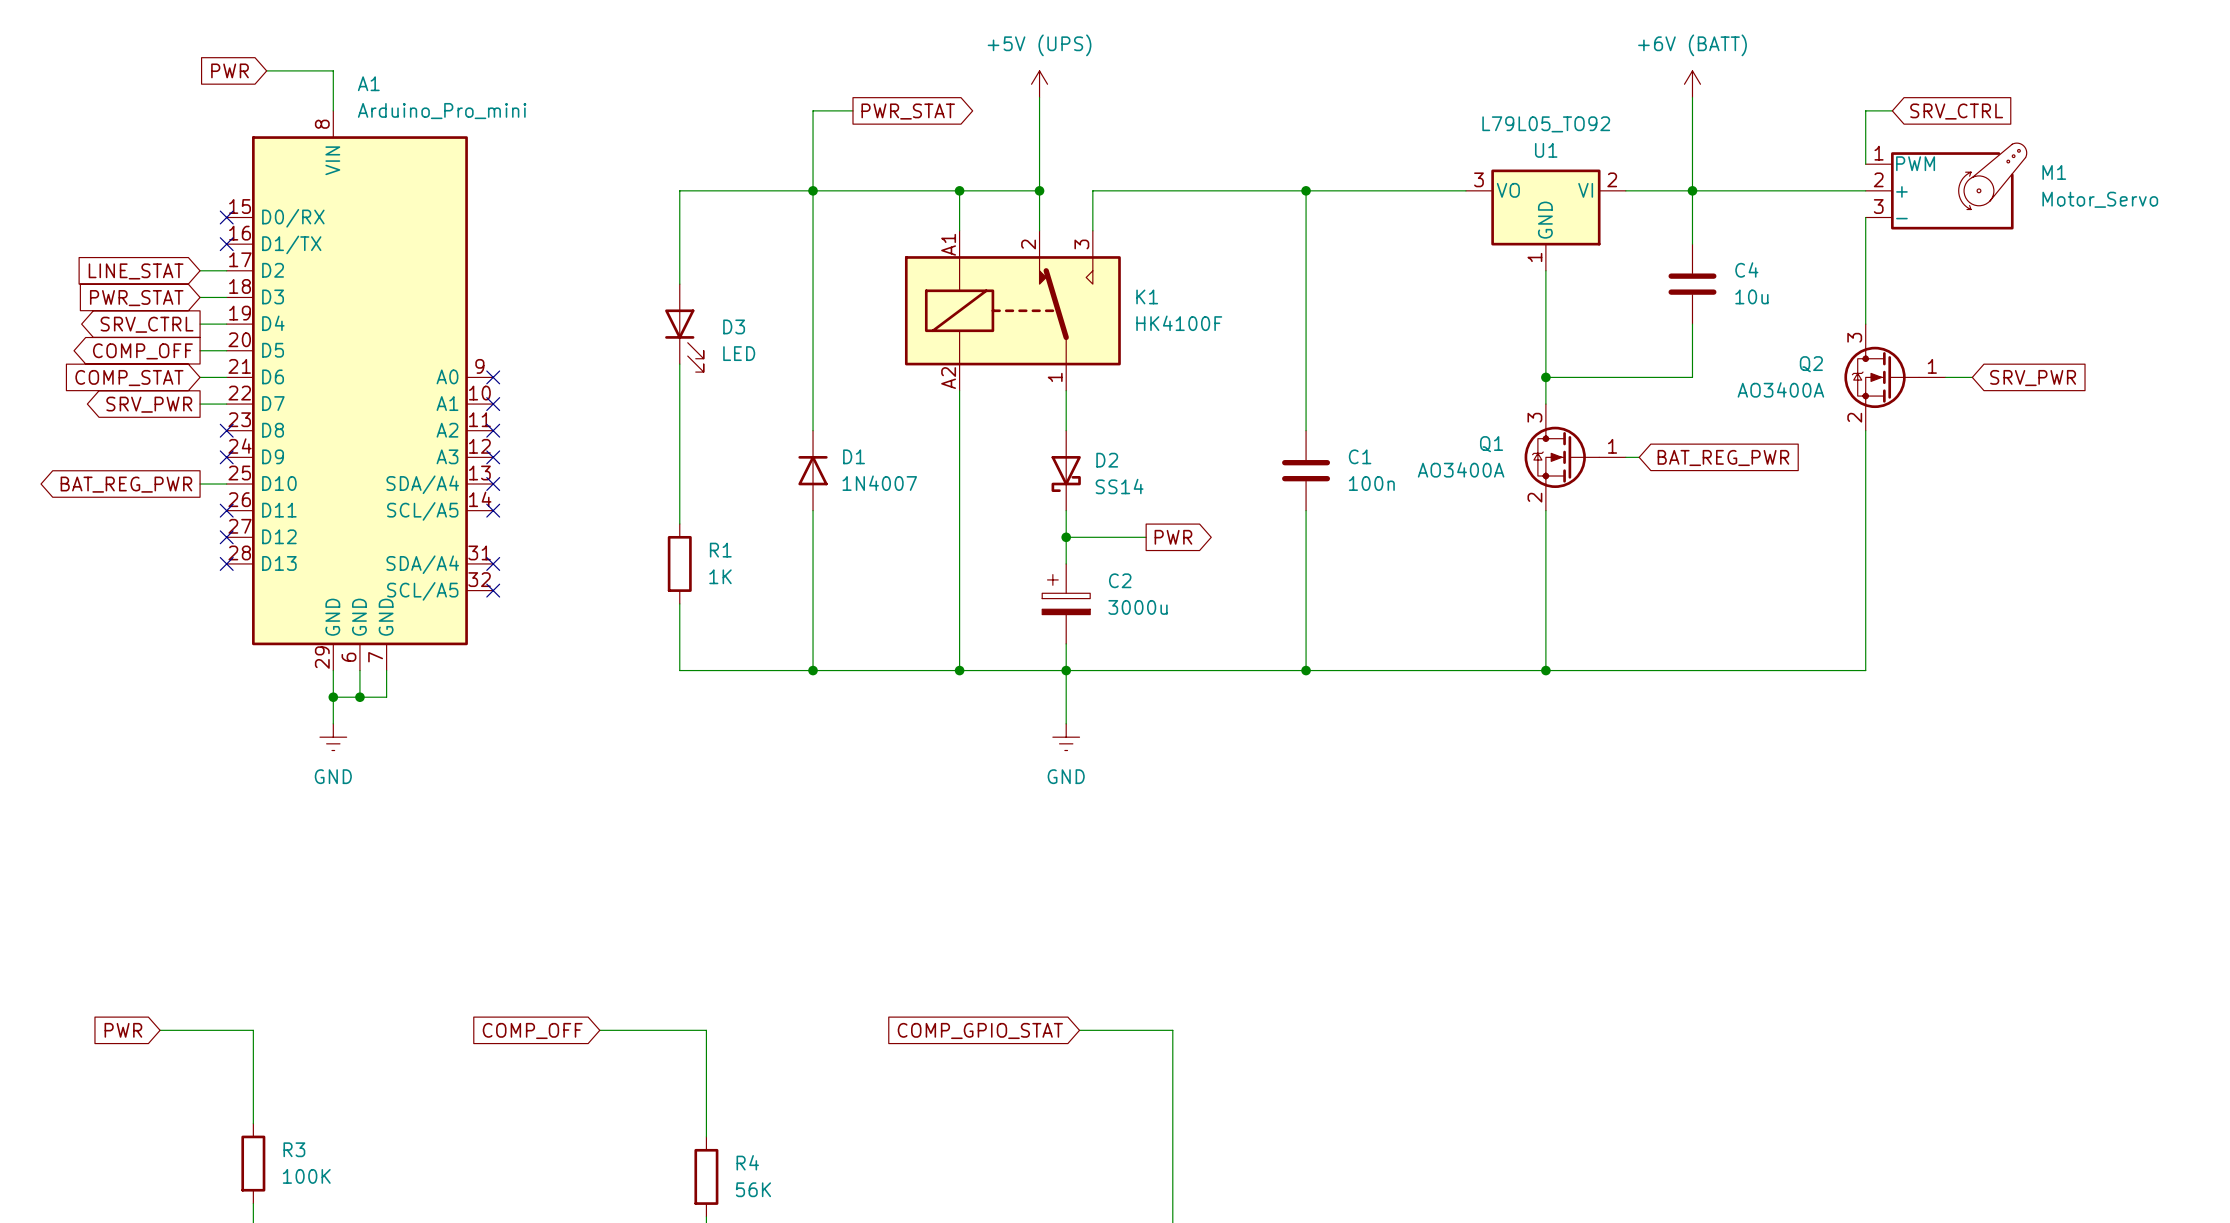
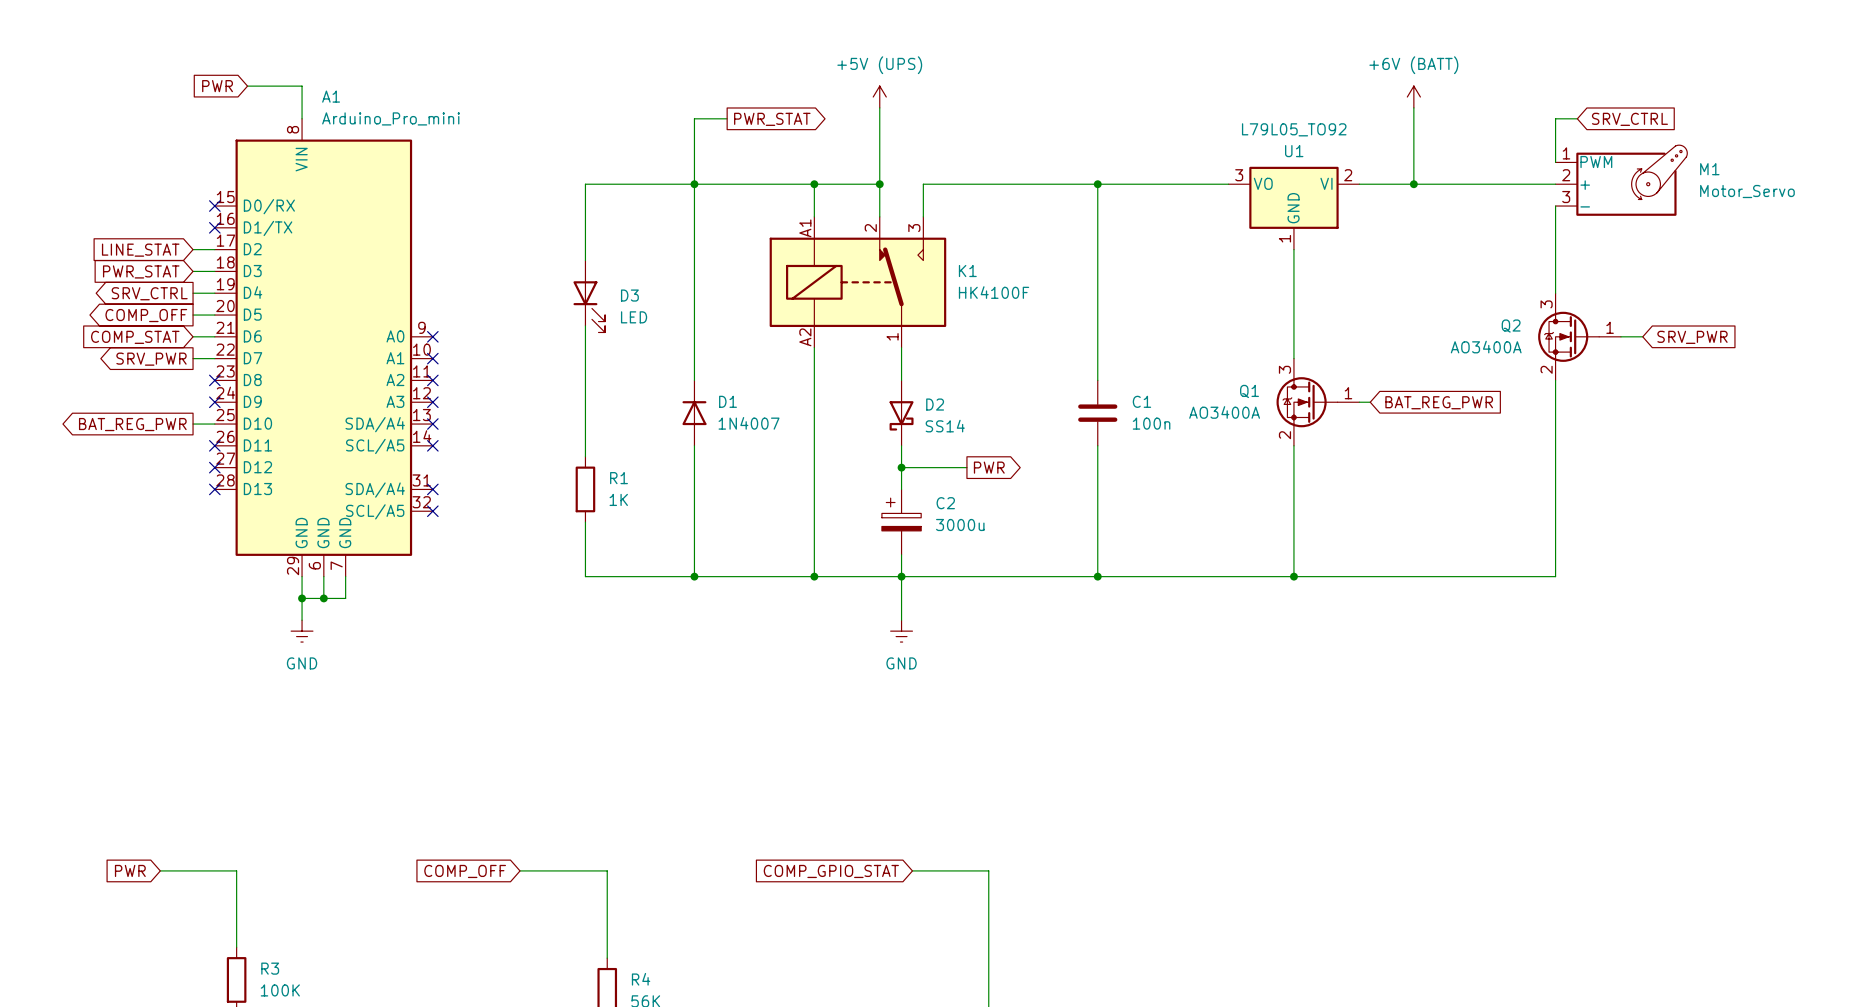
wire: (1692, 190) (1692, 244) -> none
C4: 10u (1692, 284) -> none
wire: (1692, 324) (1692, 377) (1545, 377) -> none
junction: (1545, 377) -> none

